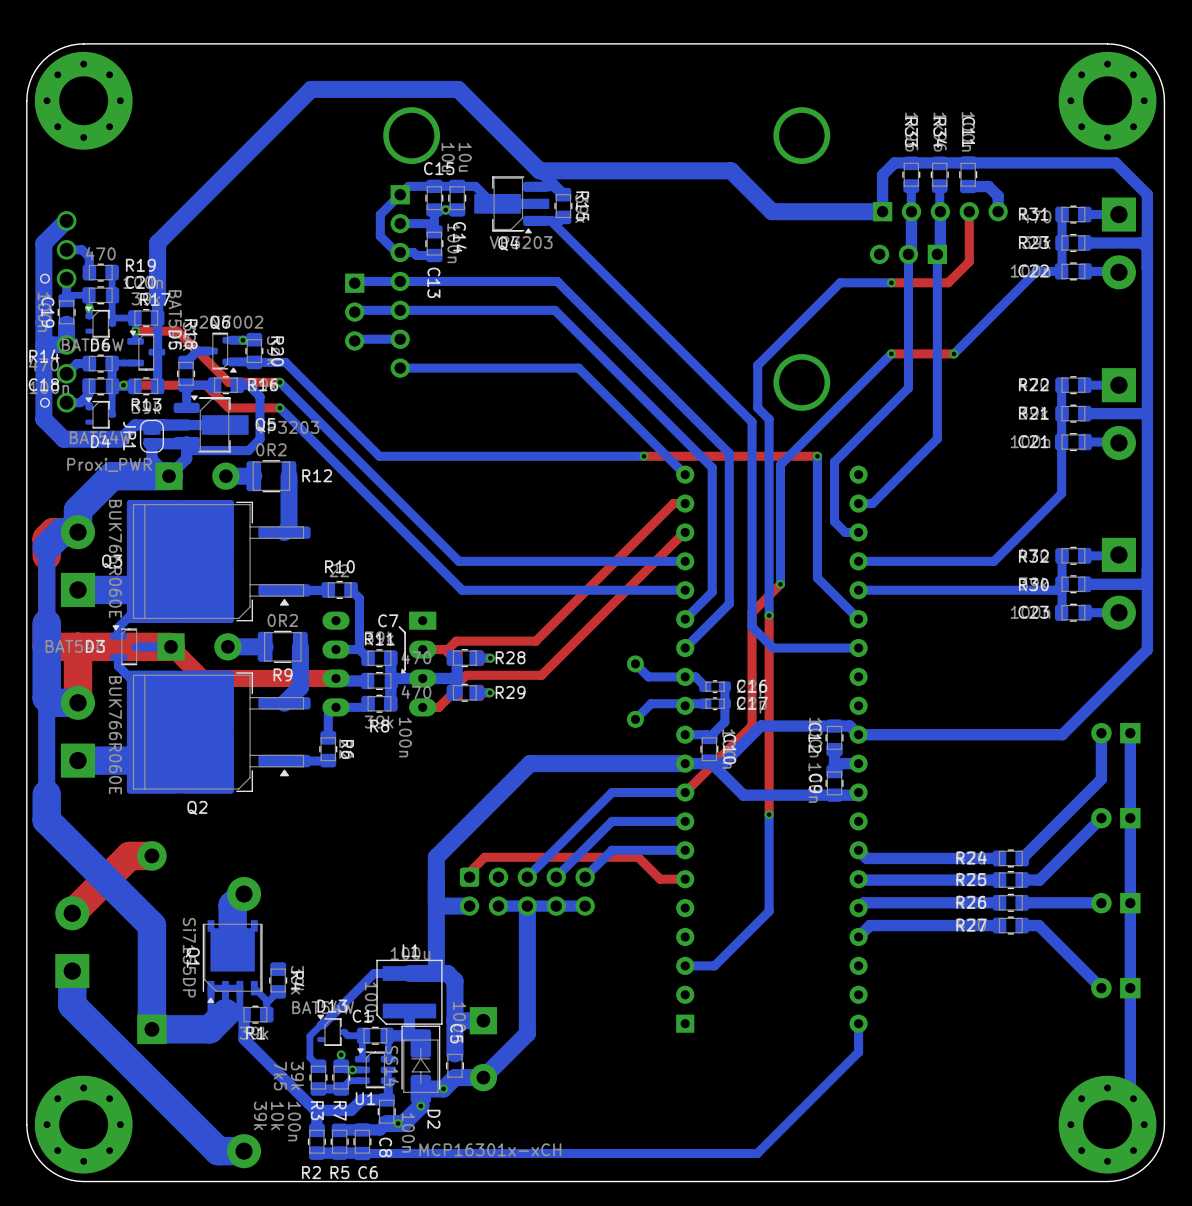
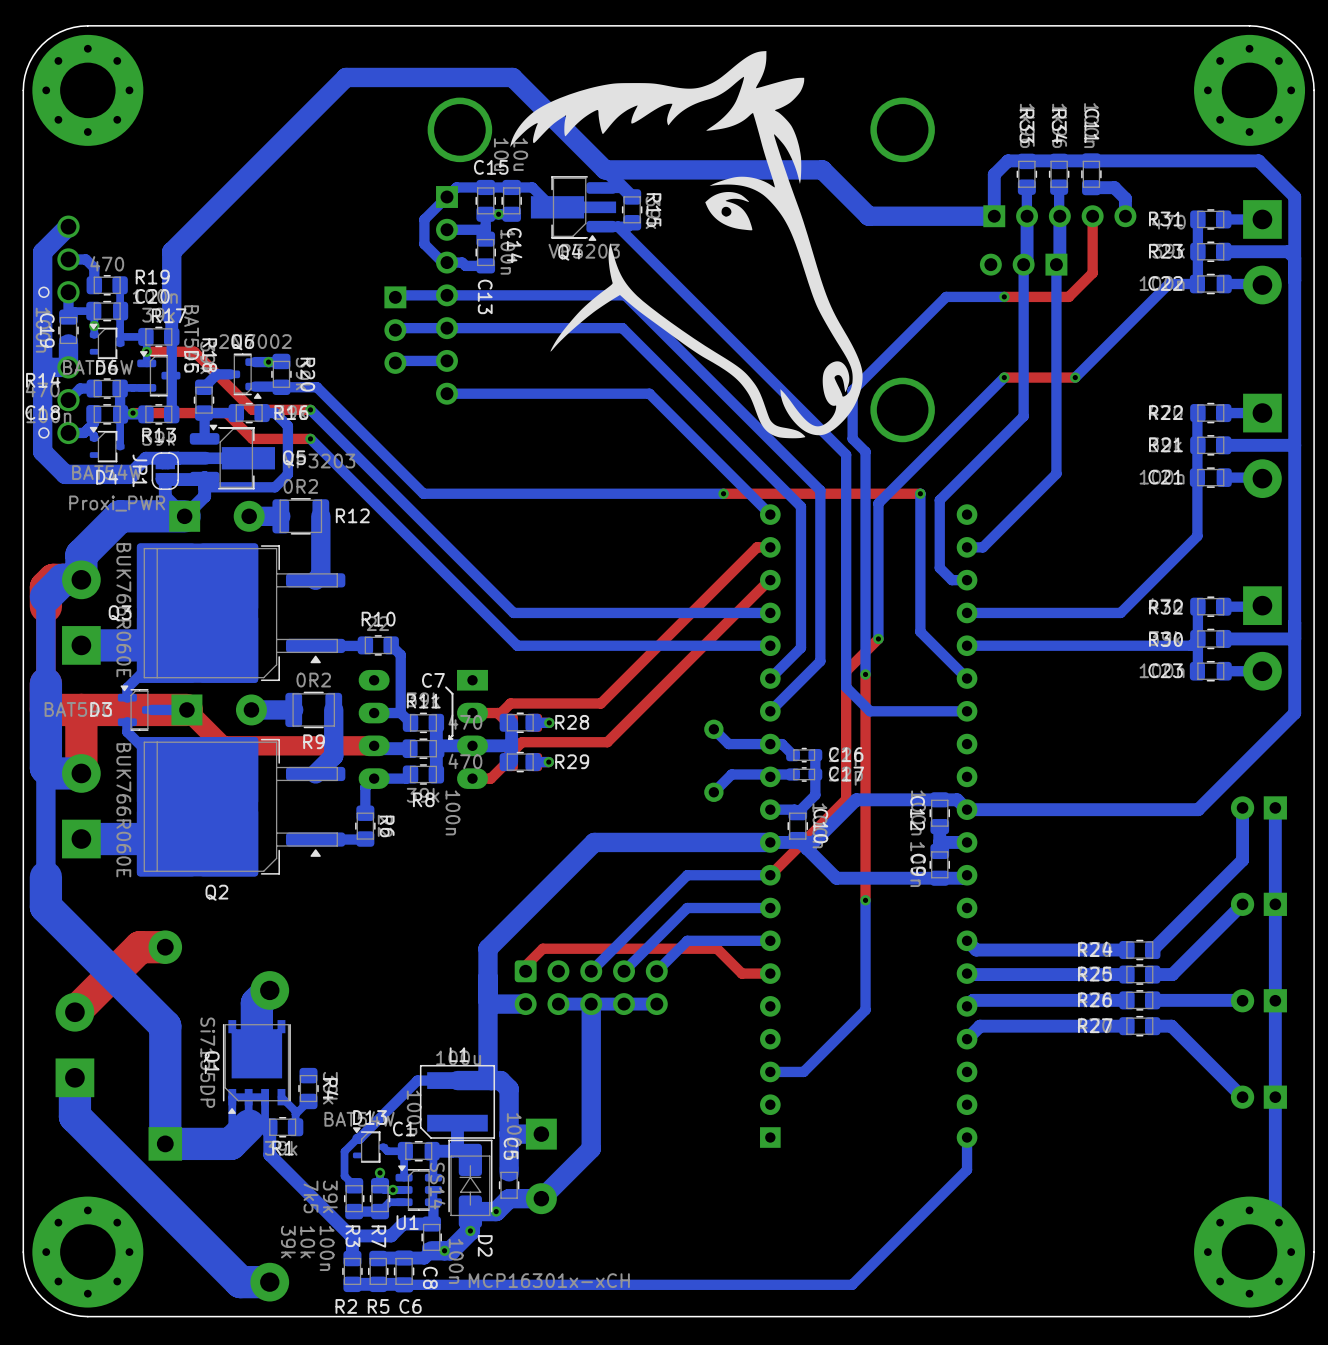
drawing: none -> [510, 51, 863, 439]

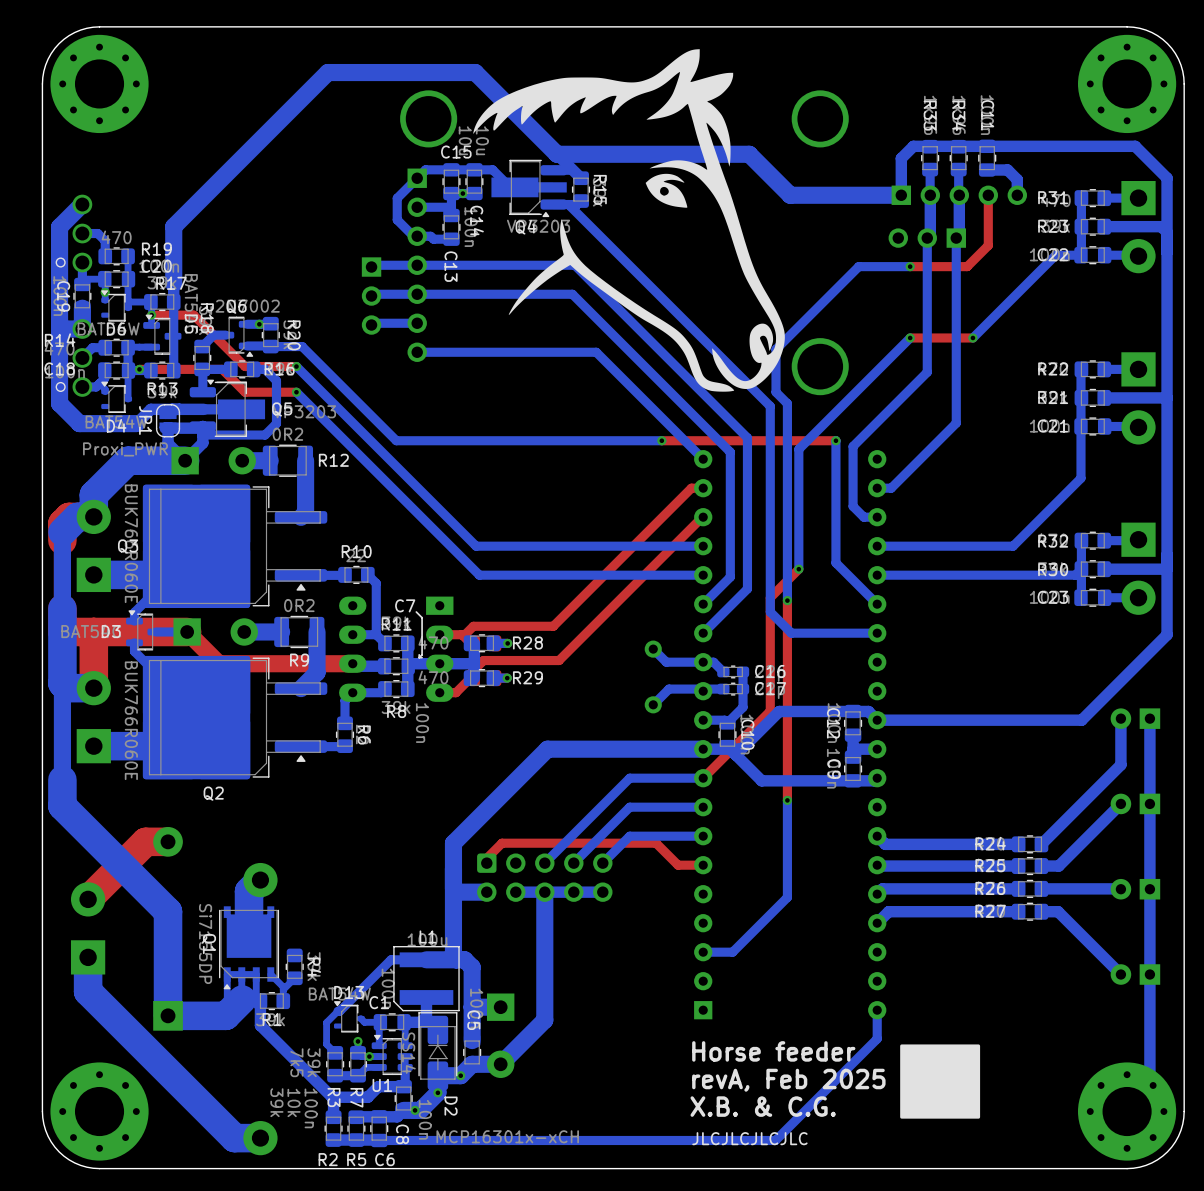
drawing: none -> [900, 1044, 981, 1119]
text: none -> Horse feeder (773, 1051)
text: none -> revA, Feb 2025 (788, 1080)
text: none -> X.B. & C.G. (763, 1106)
text: none -> JLCJLCJLCJLC (749, 1138)

